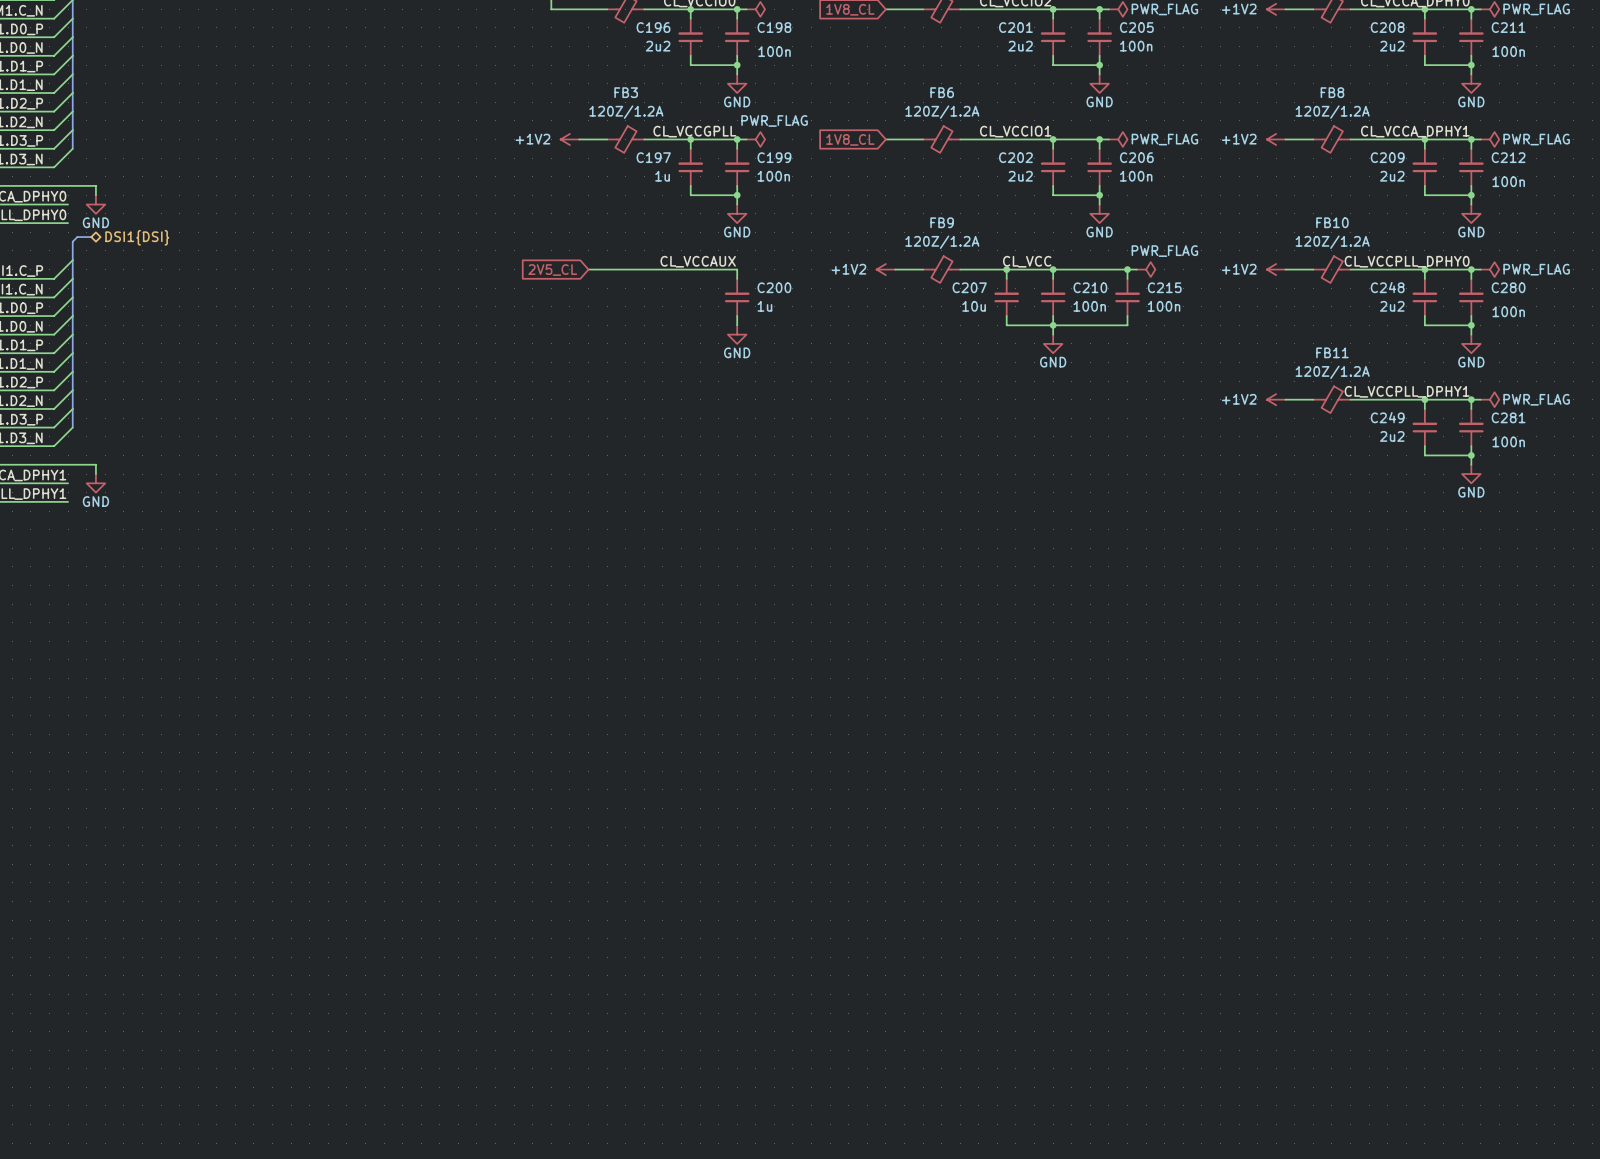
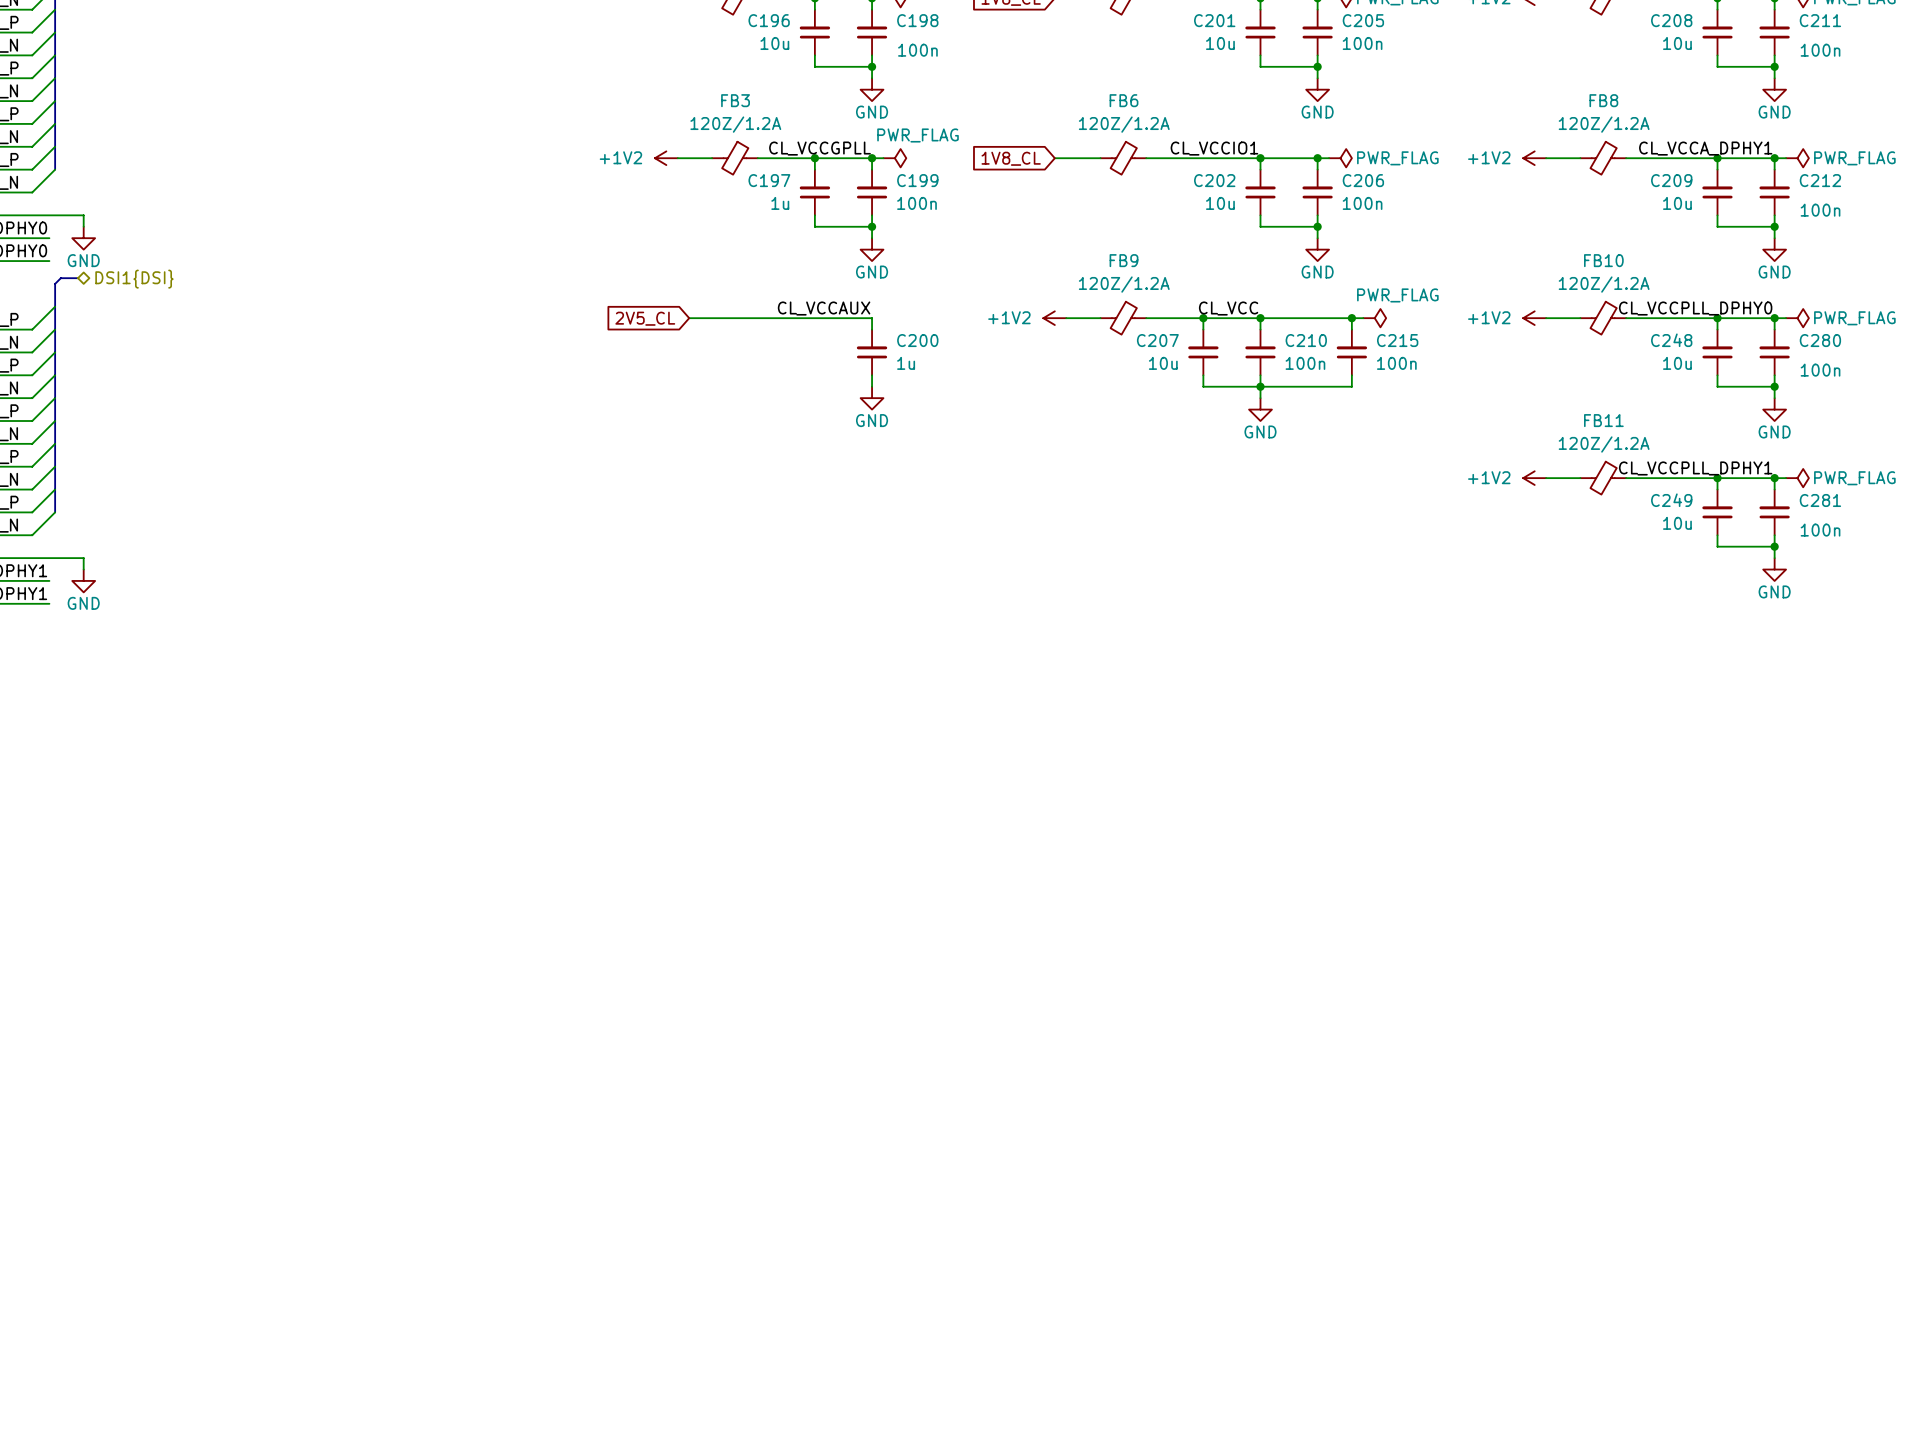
C196 text: 2u2 (658, 46) -> 10u (774, 43)
C201 text: 2u2 (1020, 46) -> 10u (1220, 43)
C208 text: 2u2 (1392, 46) -> 10u (1677, 43)
C202 text: 2u2 (1020, 176) -> 10u (1220, 203)
C209 text: 2u2 (1392, 176) -> 10u (1677, 203)
C248 text: 2u2 (1392, 306) -> 10u (1677, 363)
C249 text: 2u2 (1392, 436) -> 10u (1677, 523)

